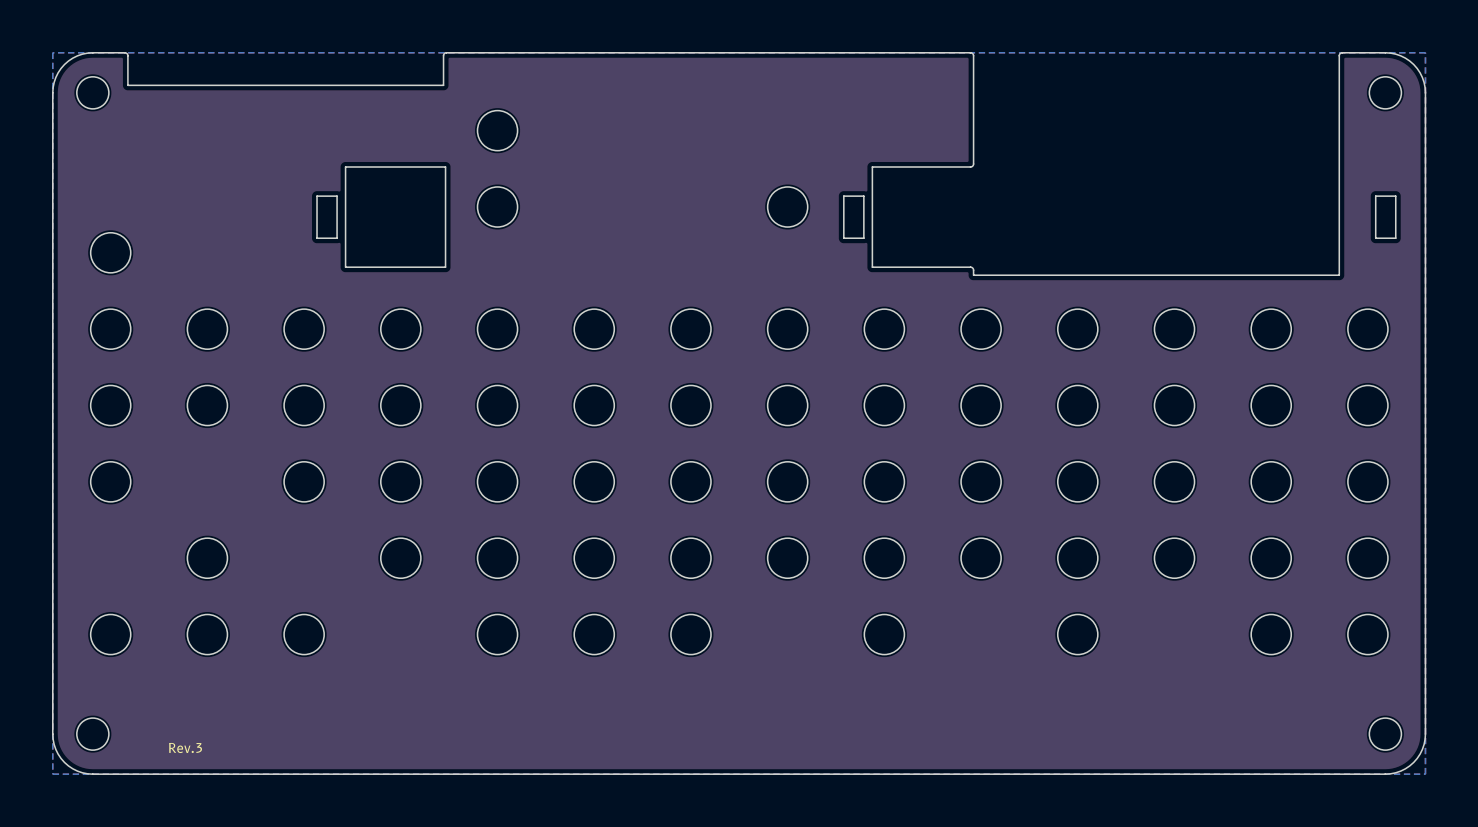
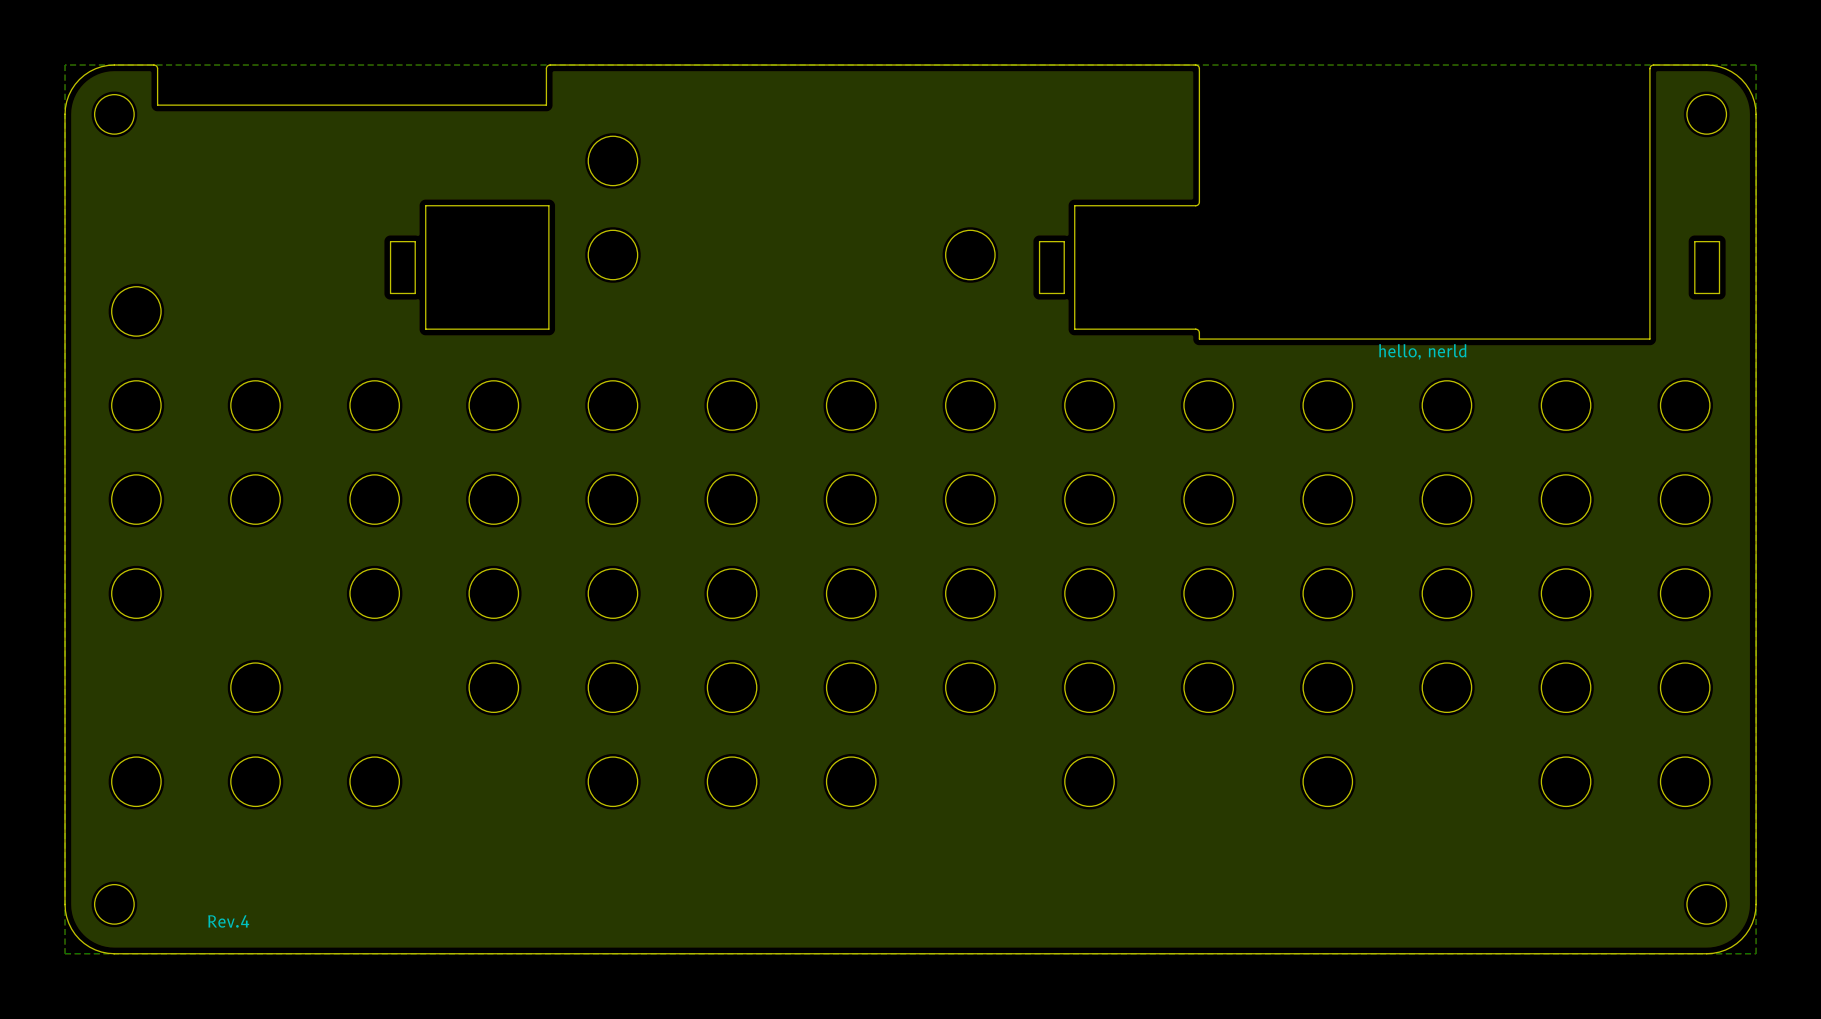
text: none -> hello, nerld (1422, 351)
text: Rev.3 (185, 748) -> Rev.4 (228, 921)

